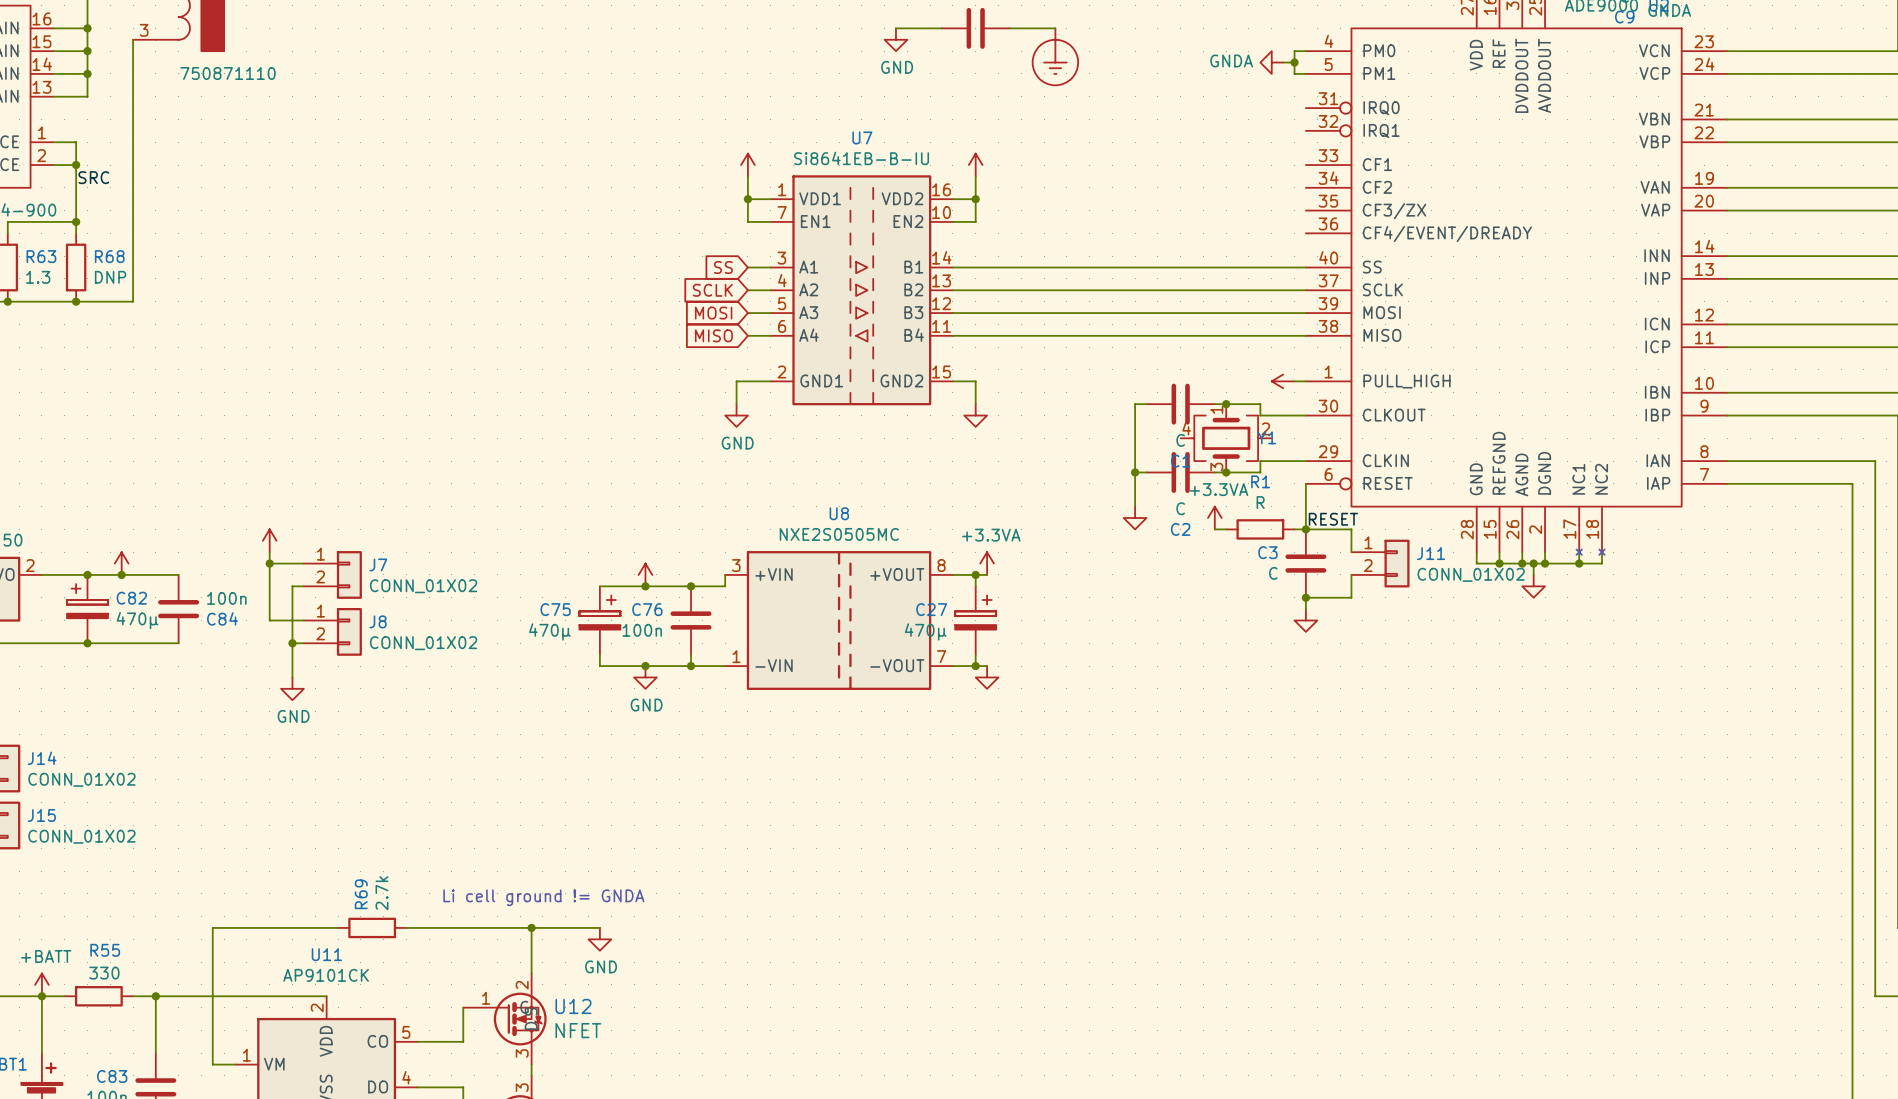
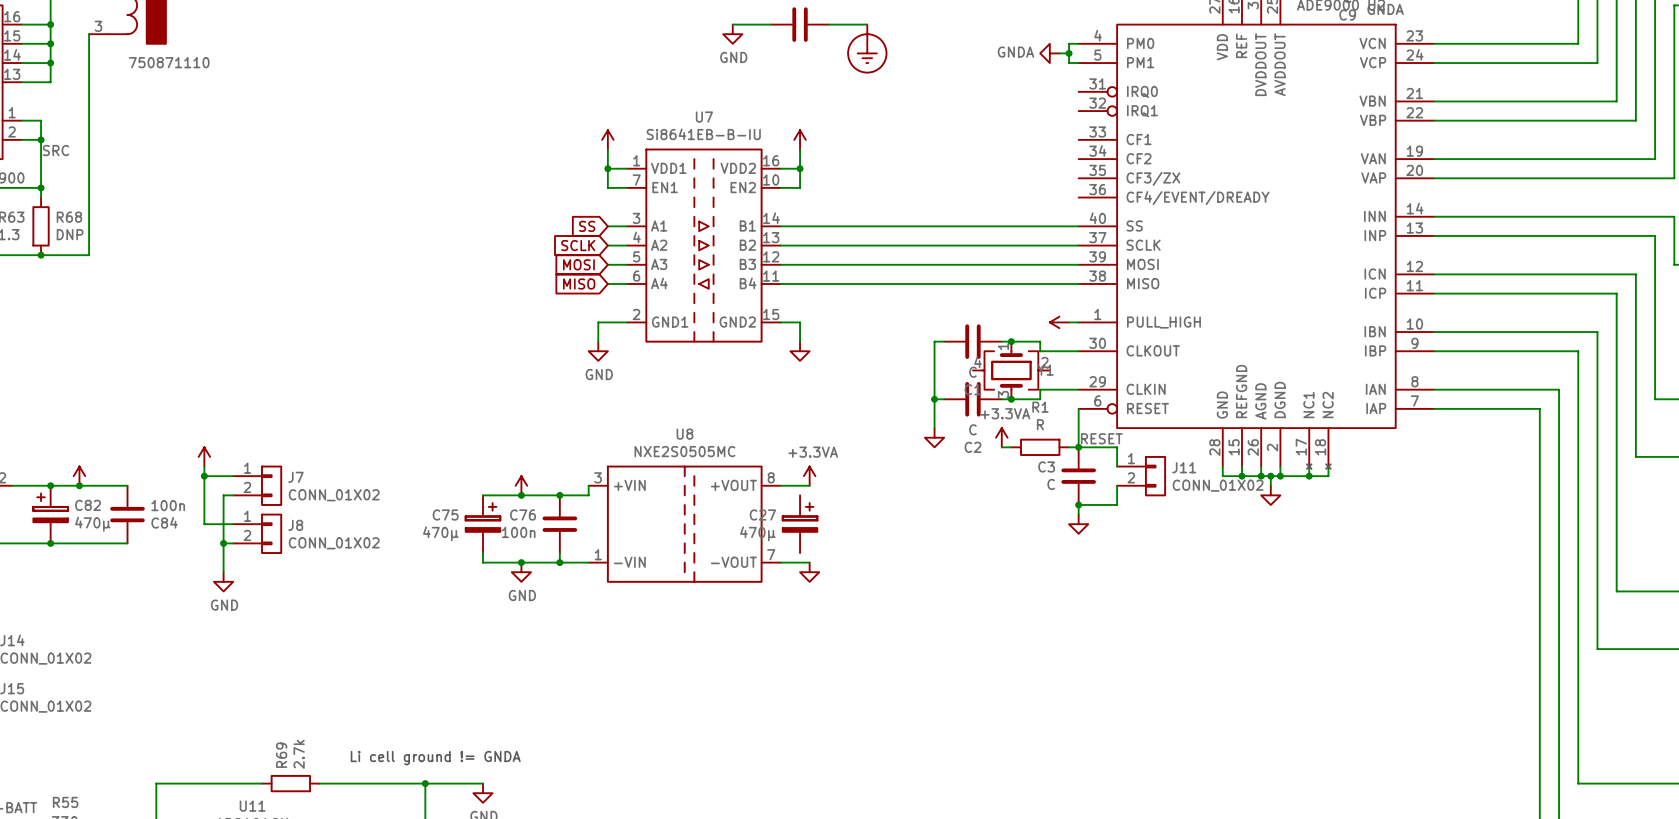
wire: (975, 574) (975, 586) -> none
junction: (975, 574) -> none
wire: (975, 654) (975, 666) -> none
junction: (975, 666) -> none

